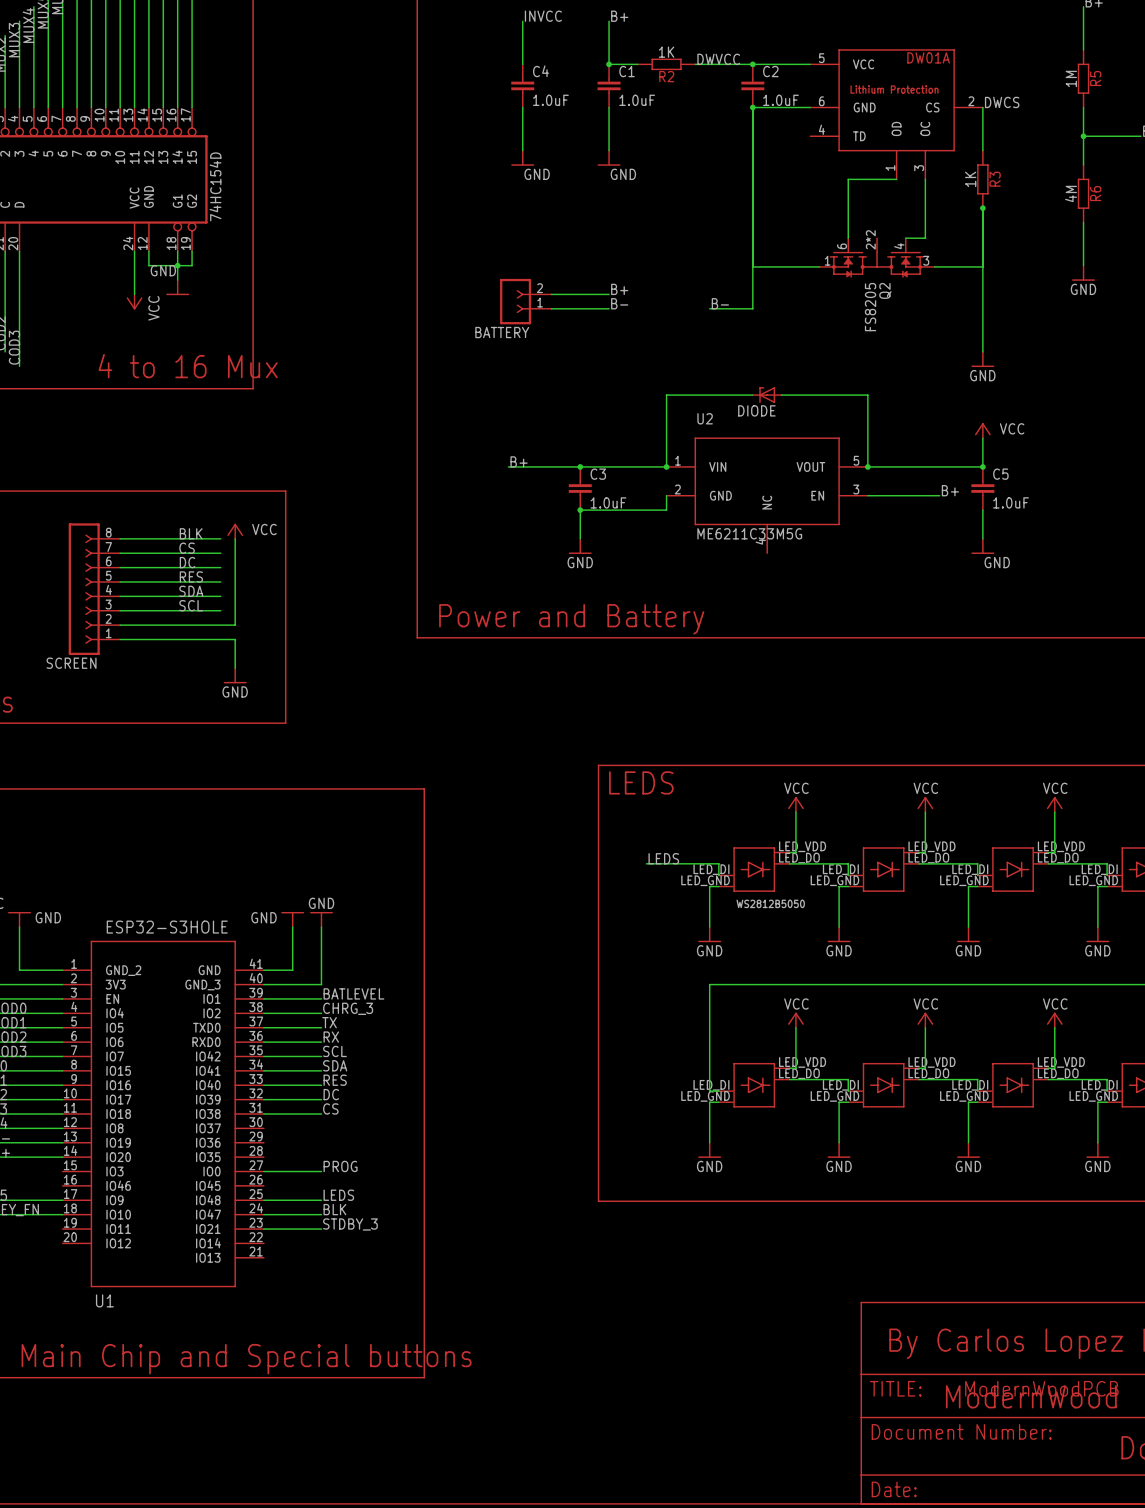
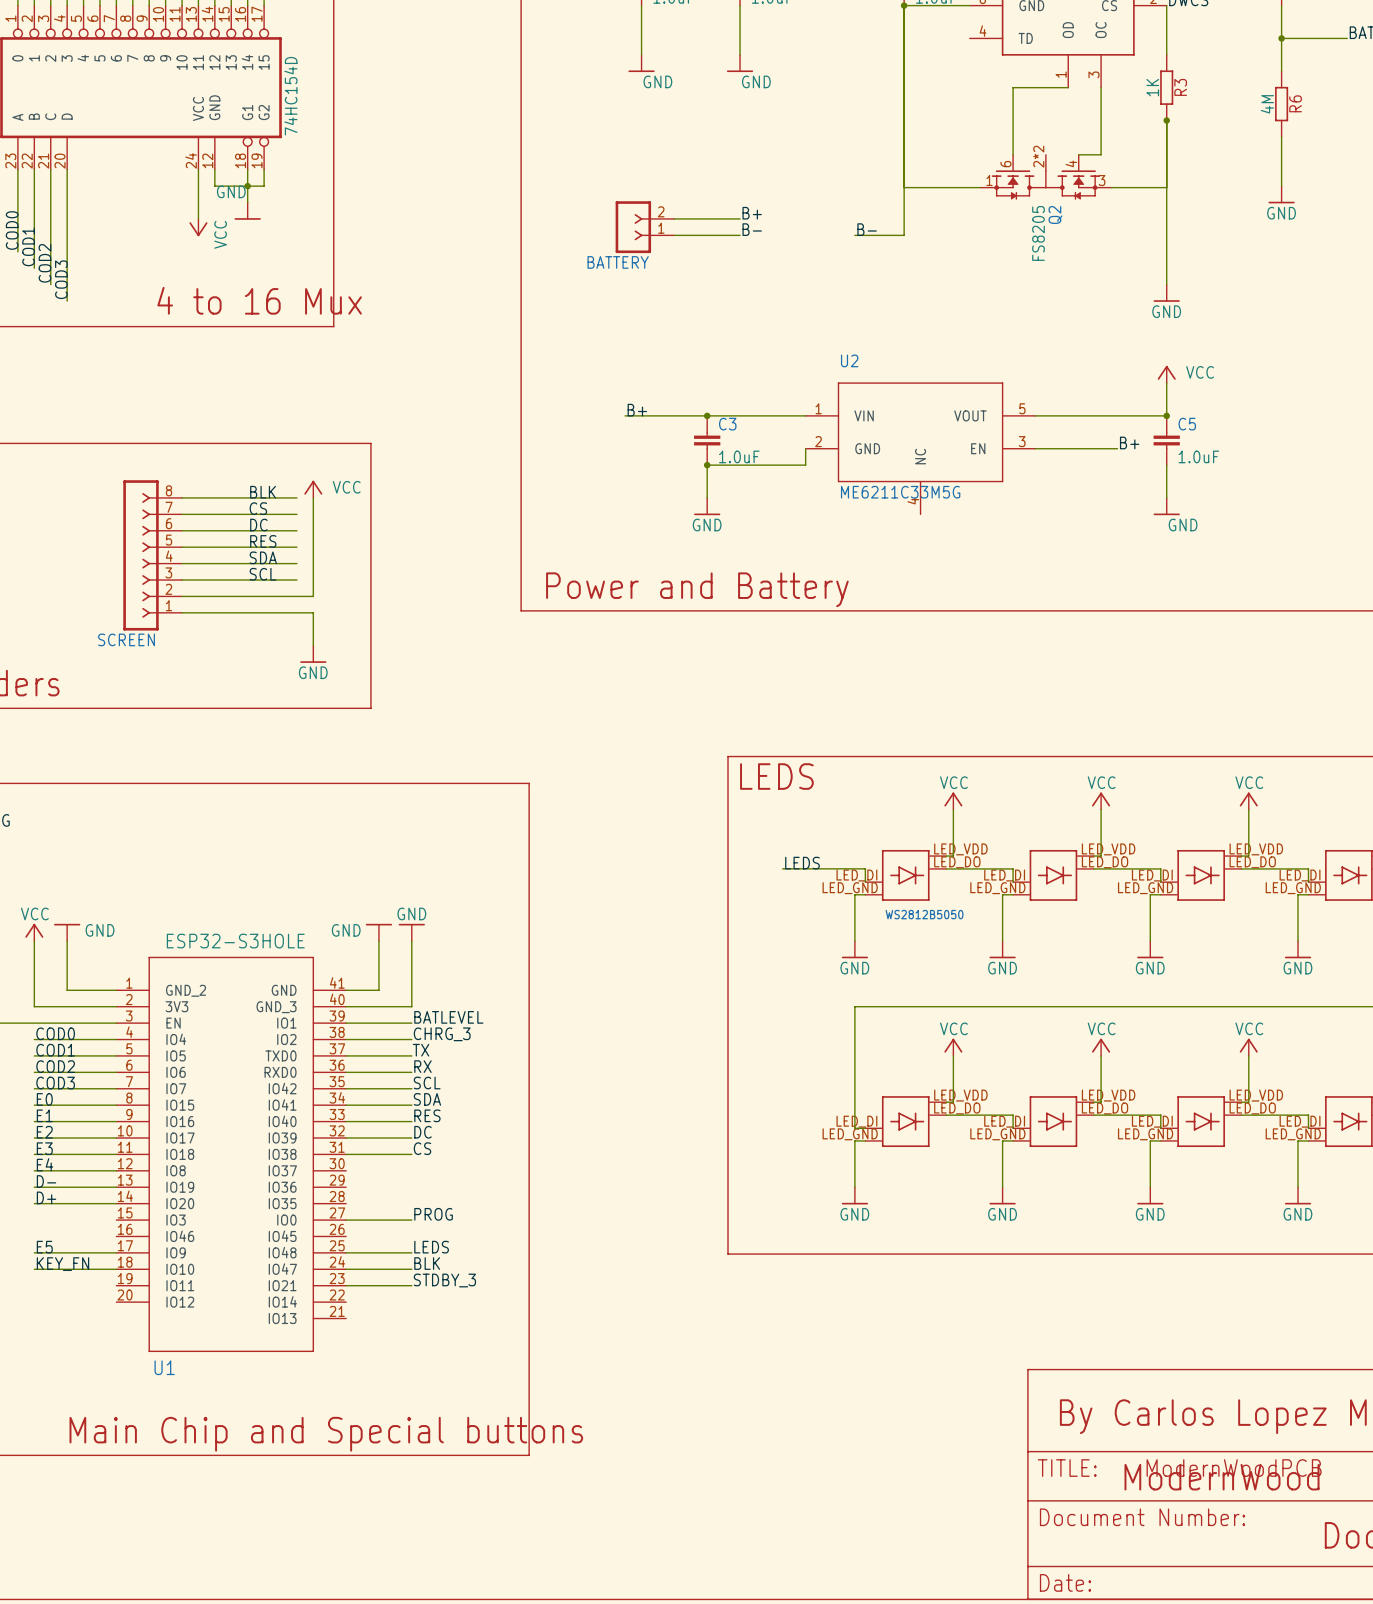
wire: (752, 395) (666, 395) (666, 466) -> none
DIODE: (767, 395) -> none
wire: (781, 395) (867, 395) (867, 466) -> none
junction: (666, 466) -> none
junction: (867, 466) -> none

